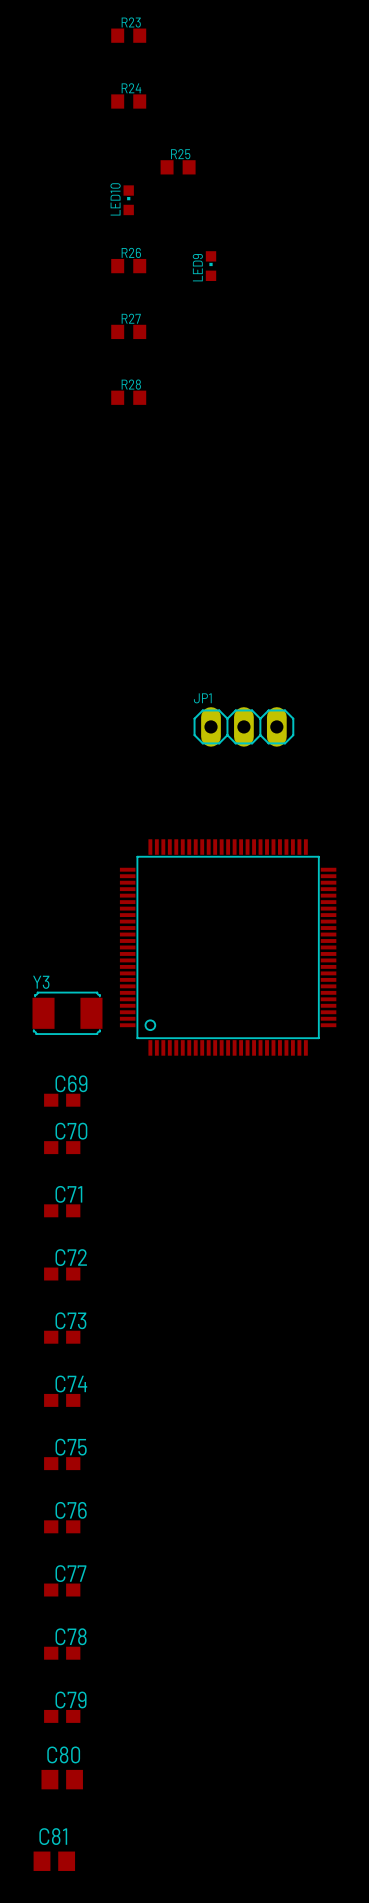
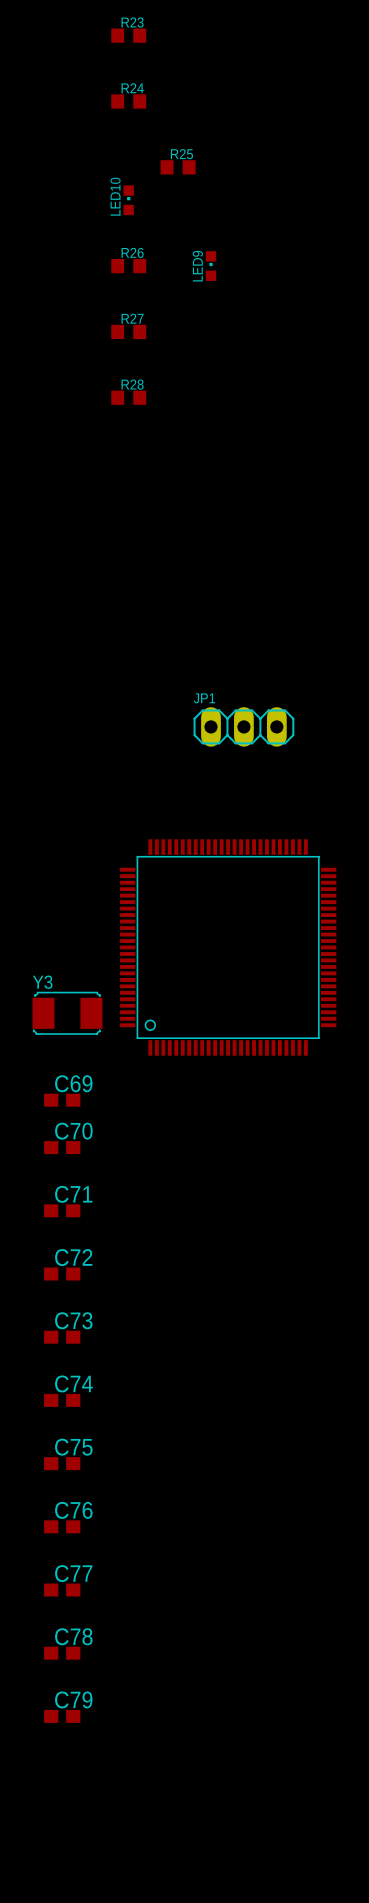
C80: (62, 1779) -> none
C81: (54, 1861) -> none

